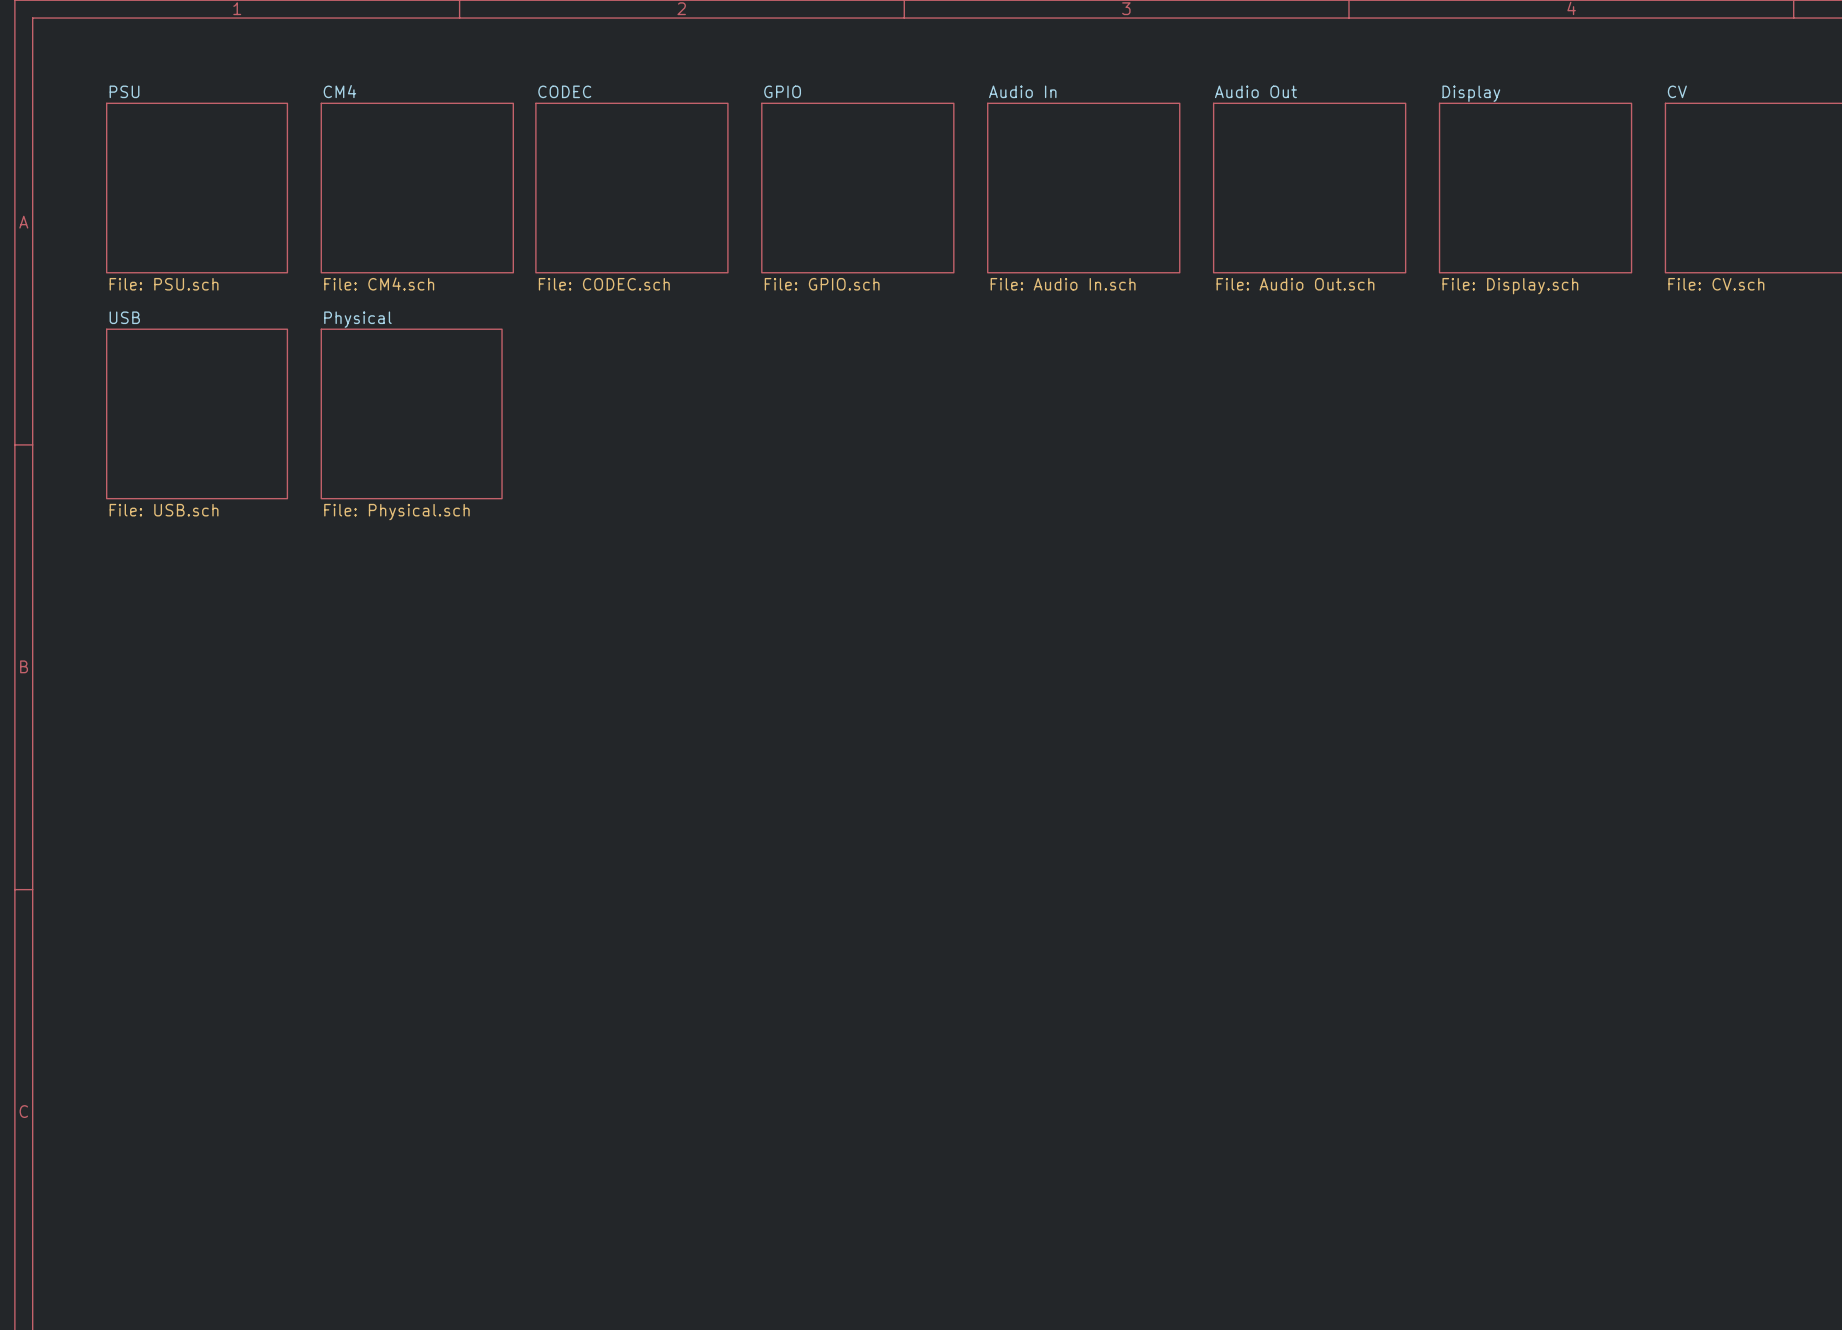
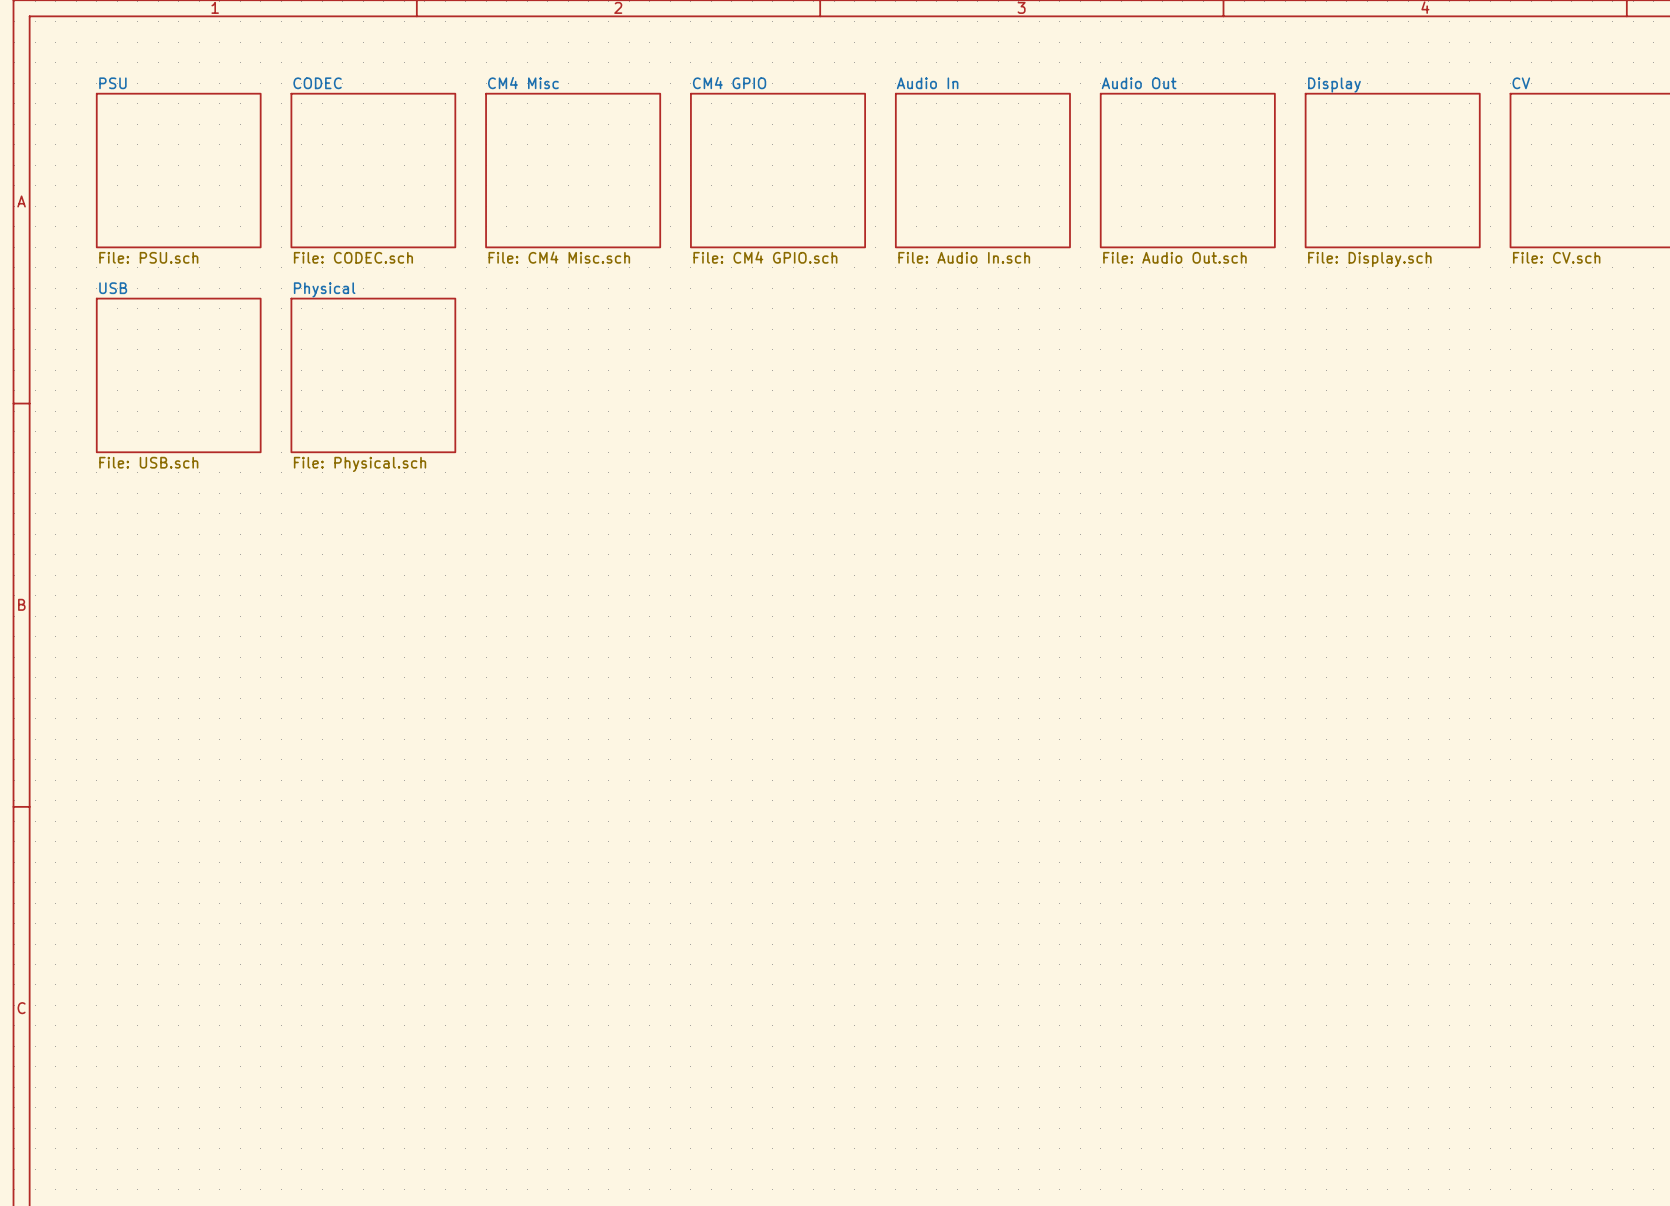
sheet CODEC name: CODEC (564, 91) -> CM4 Misc (523, 83)
sheet GPIO name: GPIO (782, 91) -> CM4 GPIO (729, 83)
sheet CODEC: none -> File: CODEC.sch (373, 170)
sheet CM4: File: CM4.sch (417, 188) -> none
sheet CODEC value: File: CODEC.sch (604, 284) -> File: CM4 Misc.sch (559, 257)
sheet GPIO value: File: GPIO.sch (822, 284) -> File: CM4 GPIO.sch (765, 257)

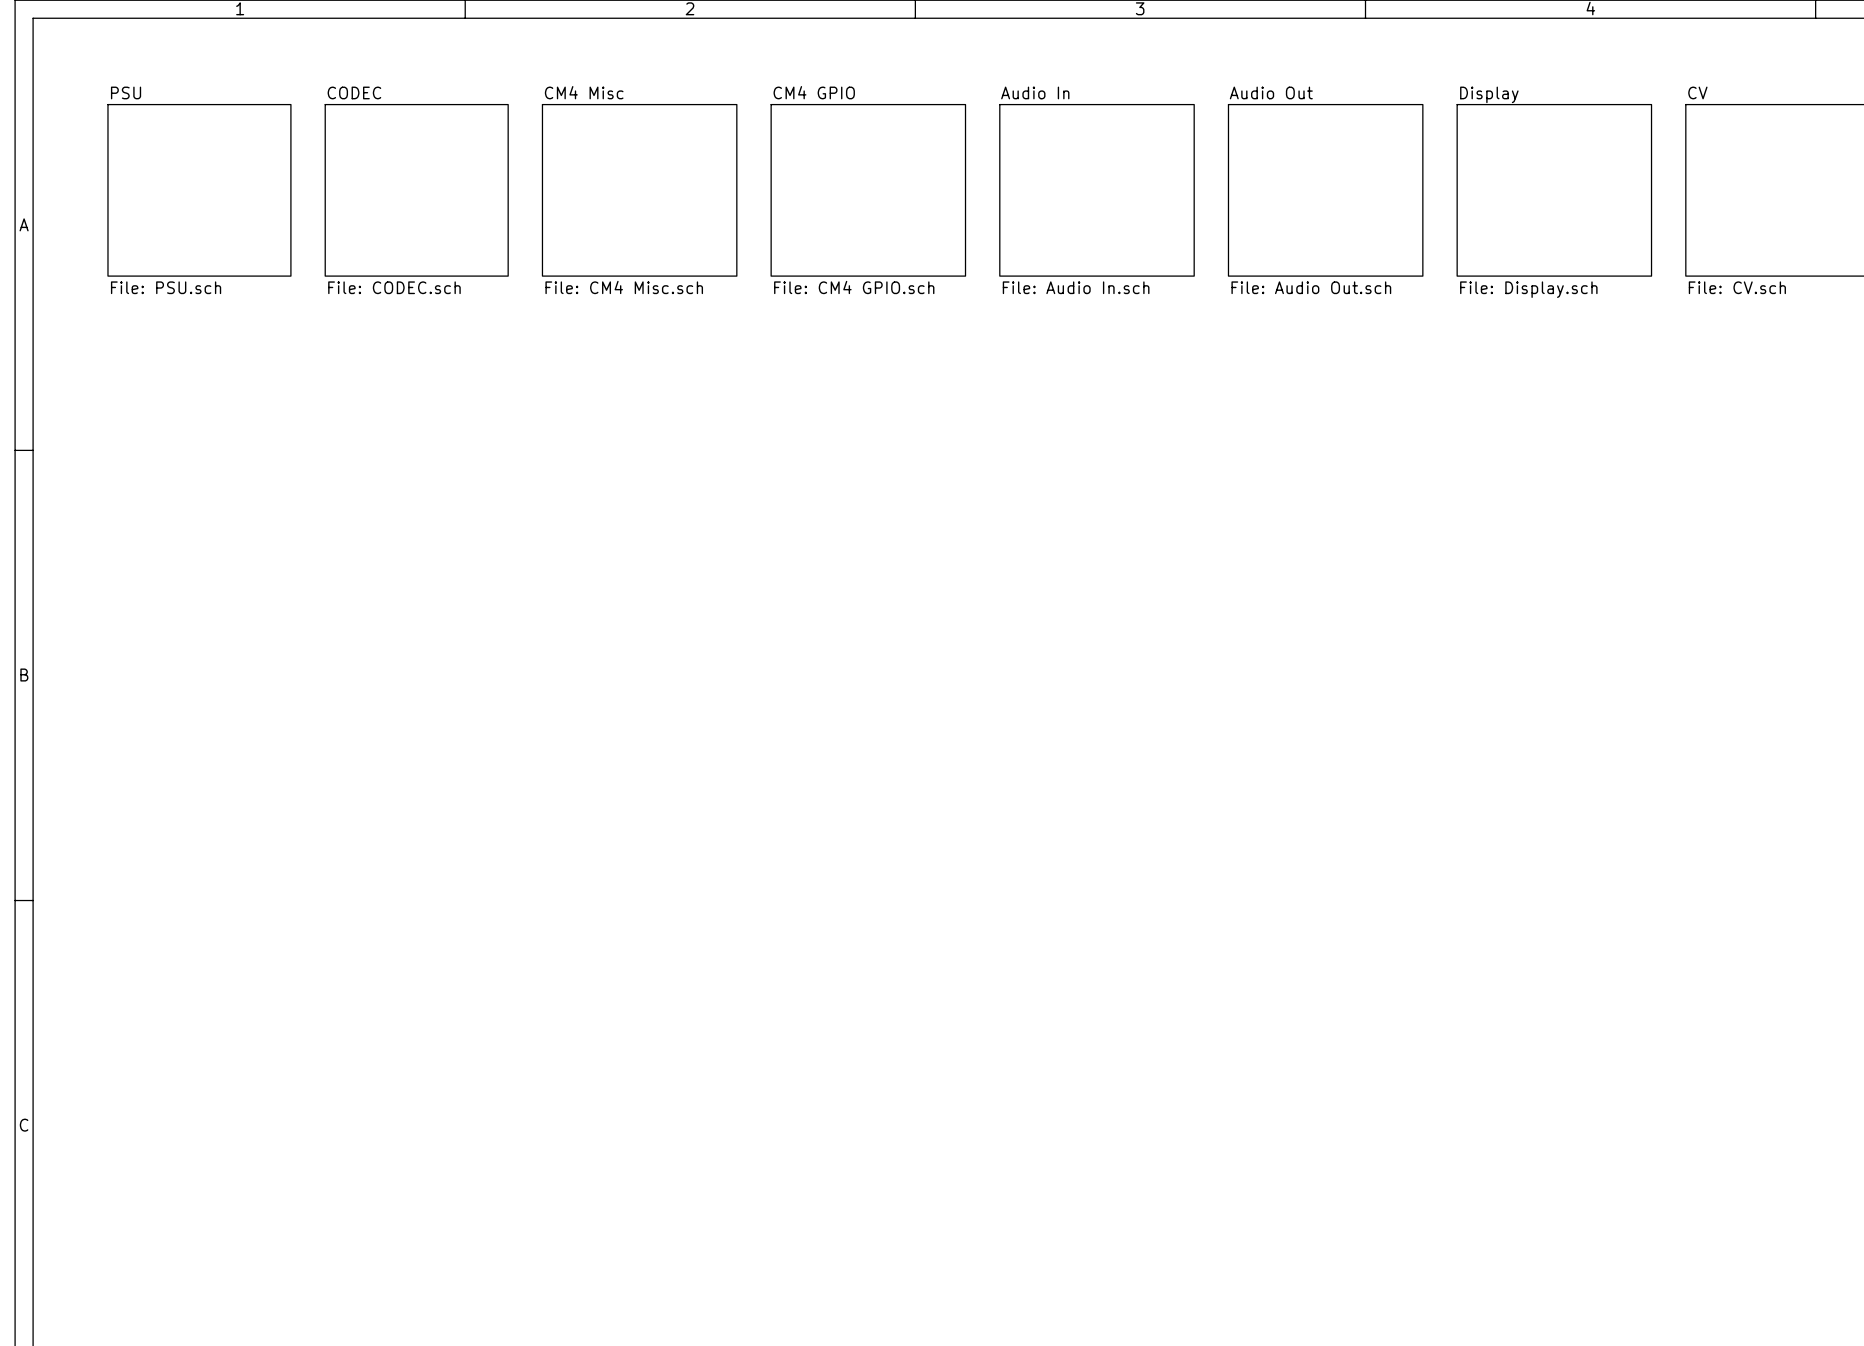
sheet USB: File: USB.sch (178, 375) -> none
sheet Physical: File: Physical.sch (373, 375) -> none

